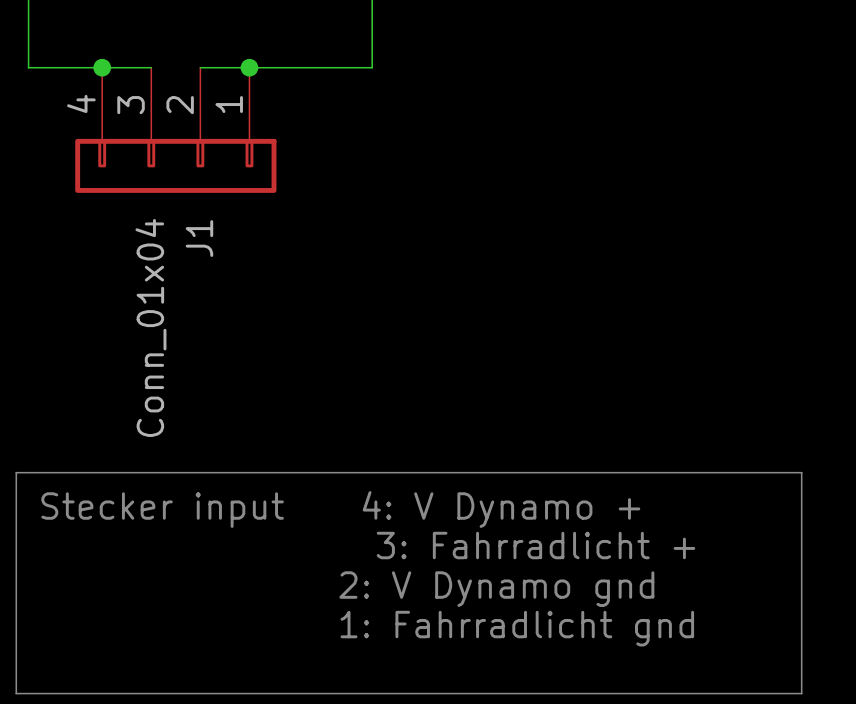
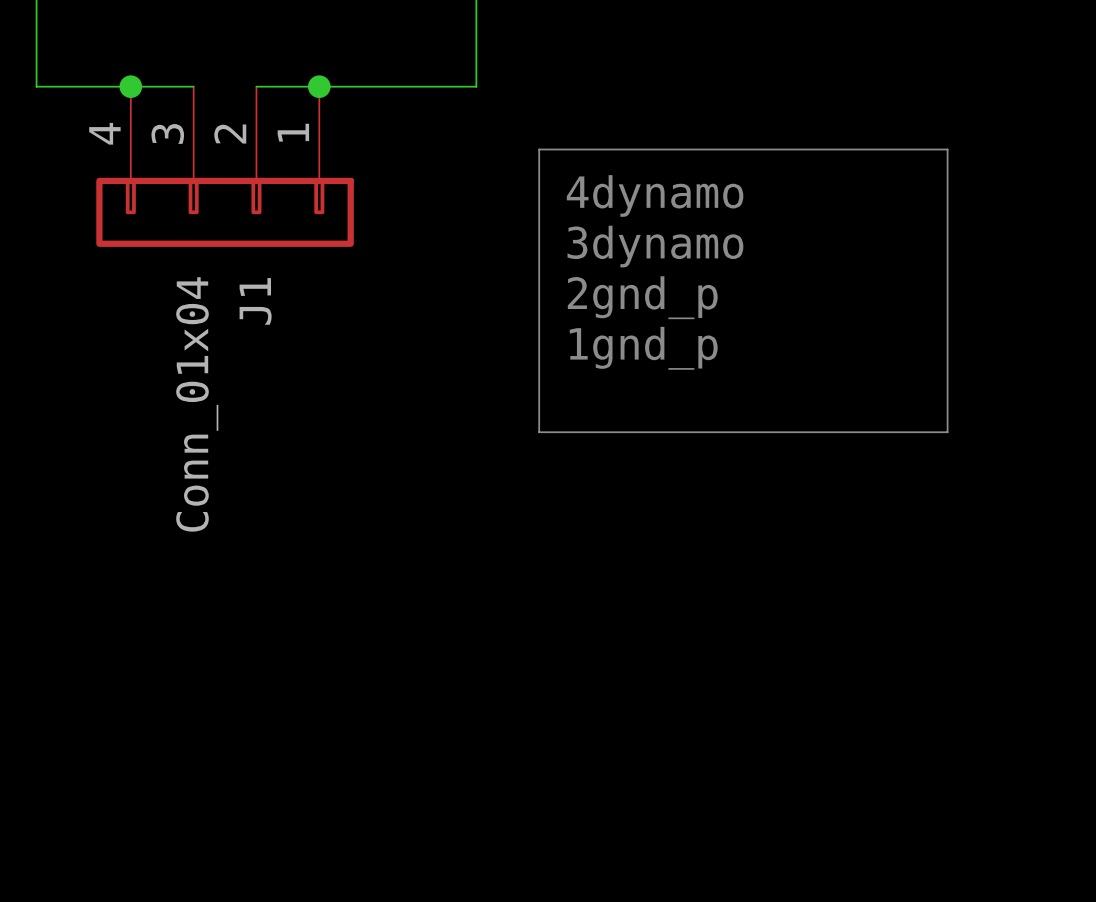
line: none -> (539, 149) (947, 149) (947, 432) (539, 432) (539, 149)
text: none -> 4dynamo (655, 195)
text: none -> 3dynamo (655, 246)
text: none -> 2gnd_p (642, 297)
text: none -> 1gnd_p (643, 348)
line: (16, 472) (801, 472) (801, 693) (16, 693) (16, 472) -> none
text: Stecker input 4: V Dynamo + (340, 509) -> none
text: 3: Fahrradlicht + (535, 545) -> none
text: 2: V Dynamo gnd (496, 589) -> none
text: 1: Fahrradlicht gnd (517, 628) -> none

